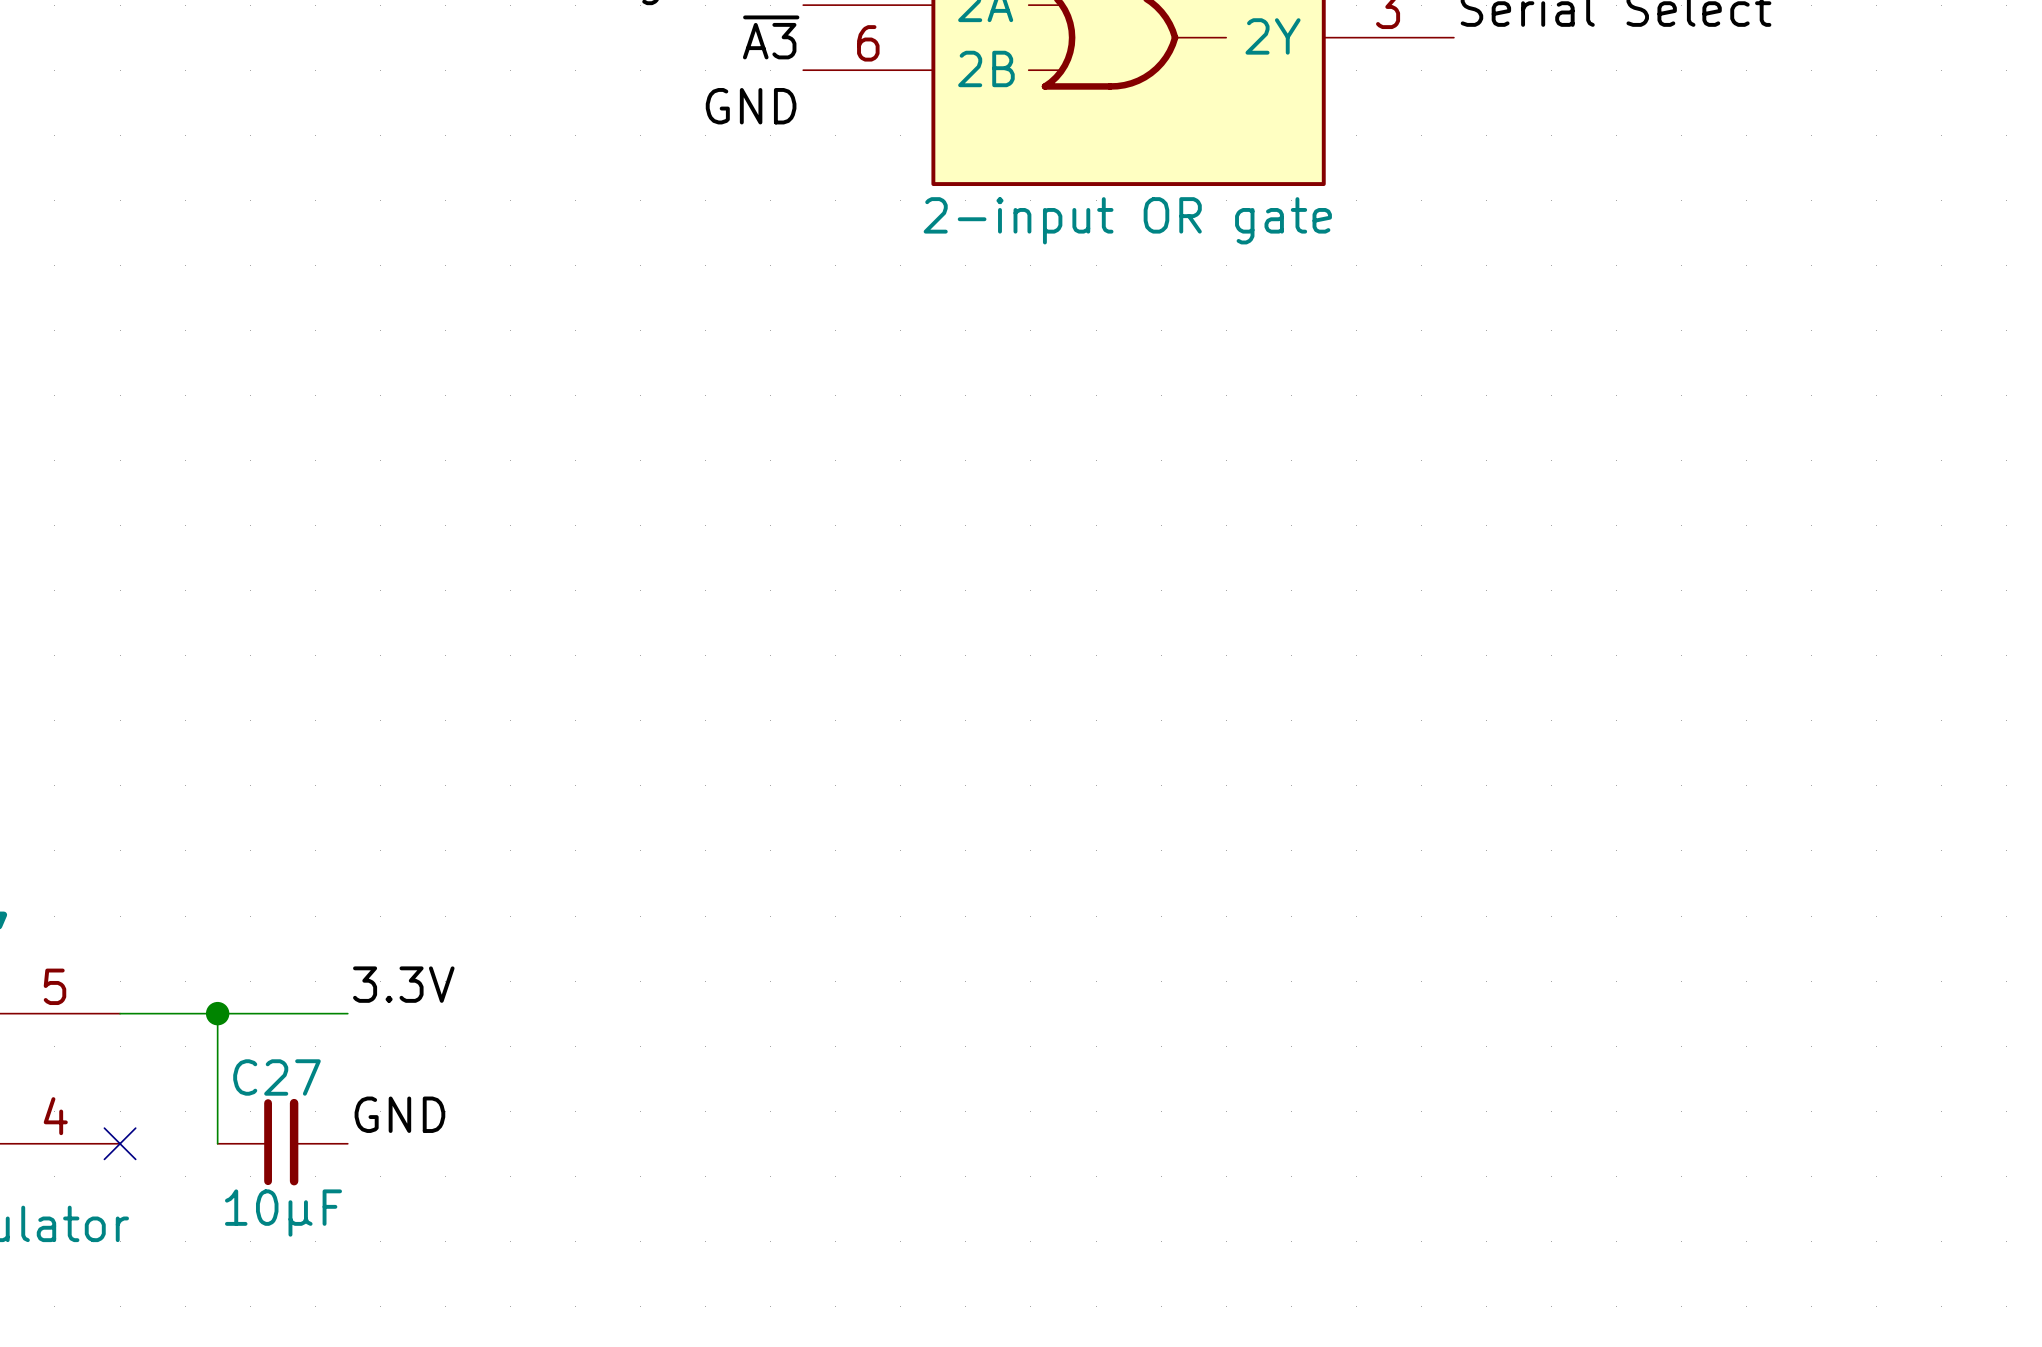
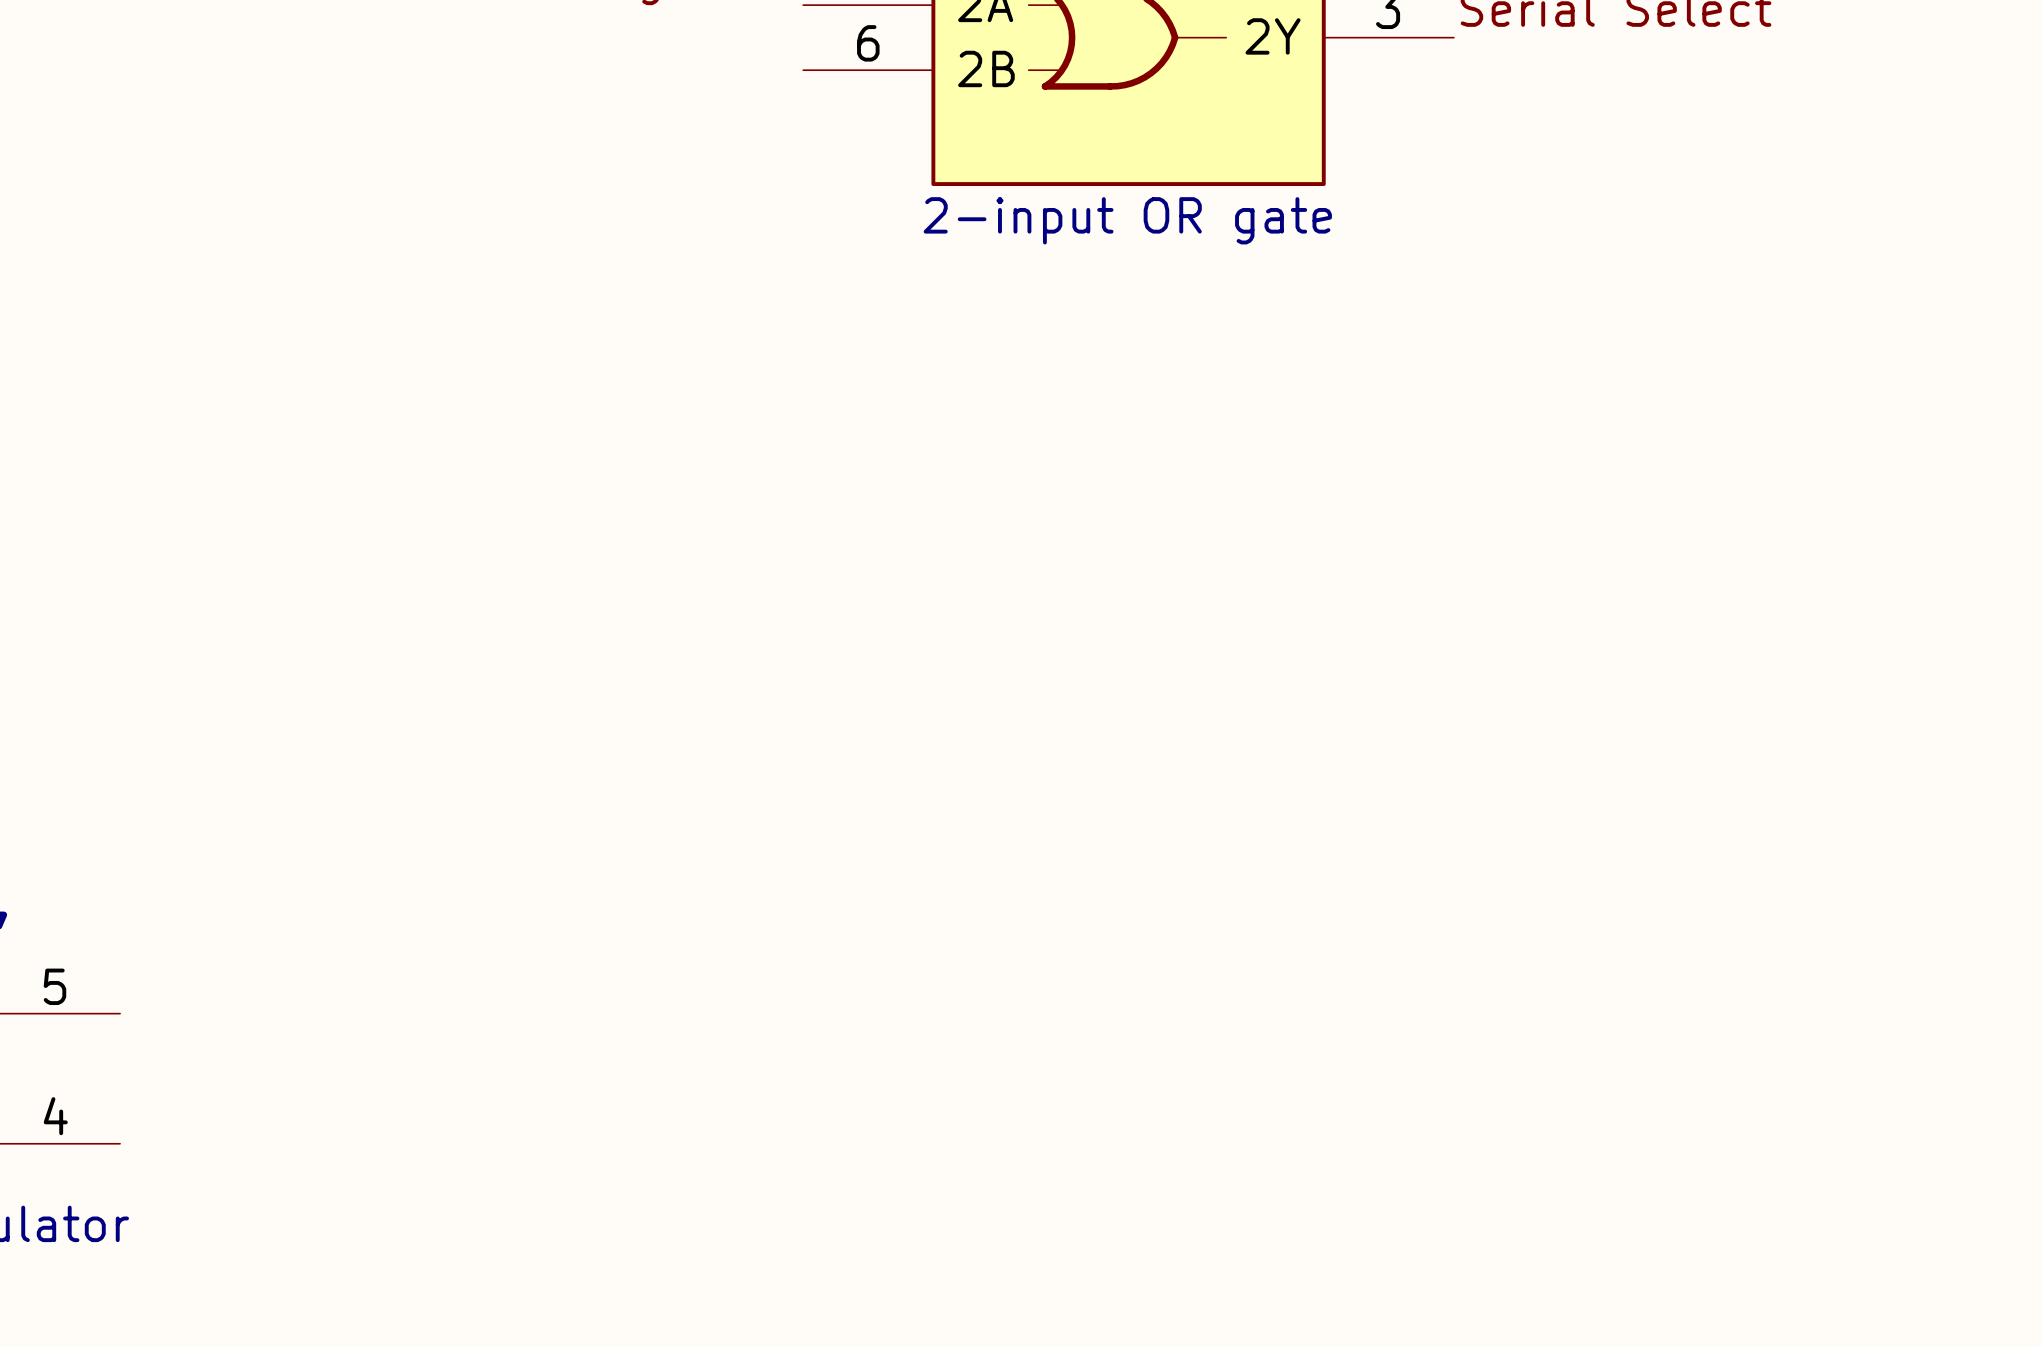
label: ~{A3} (771, 37) -> none
label: GND (751, 106) -> none
label: 3.3V (403, 984) -> none
wire: (120, 1013) (347, 1013) -> none
wire: (217, 1013) (217, 1143) -> none
junction: (217, 1013) -> none
label: GND (399, 1114) -> none
C27: 10μF (282, 1142) -> none
no-connect mark: (120, 1143) -> none

